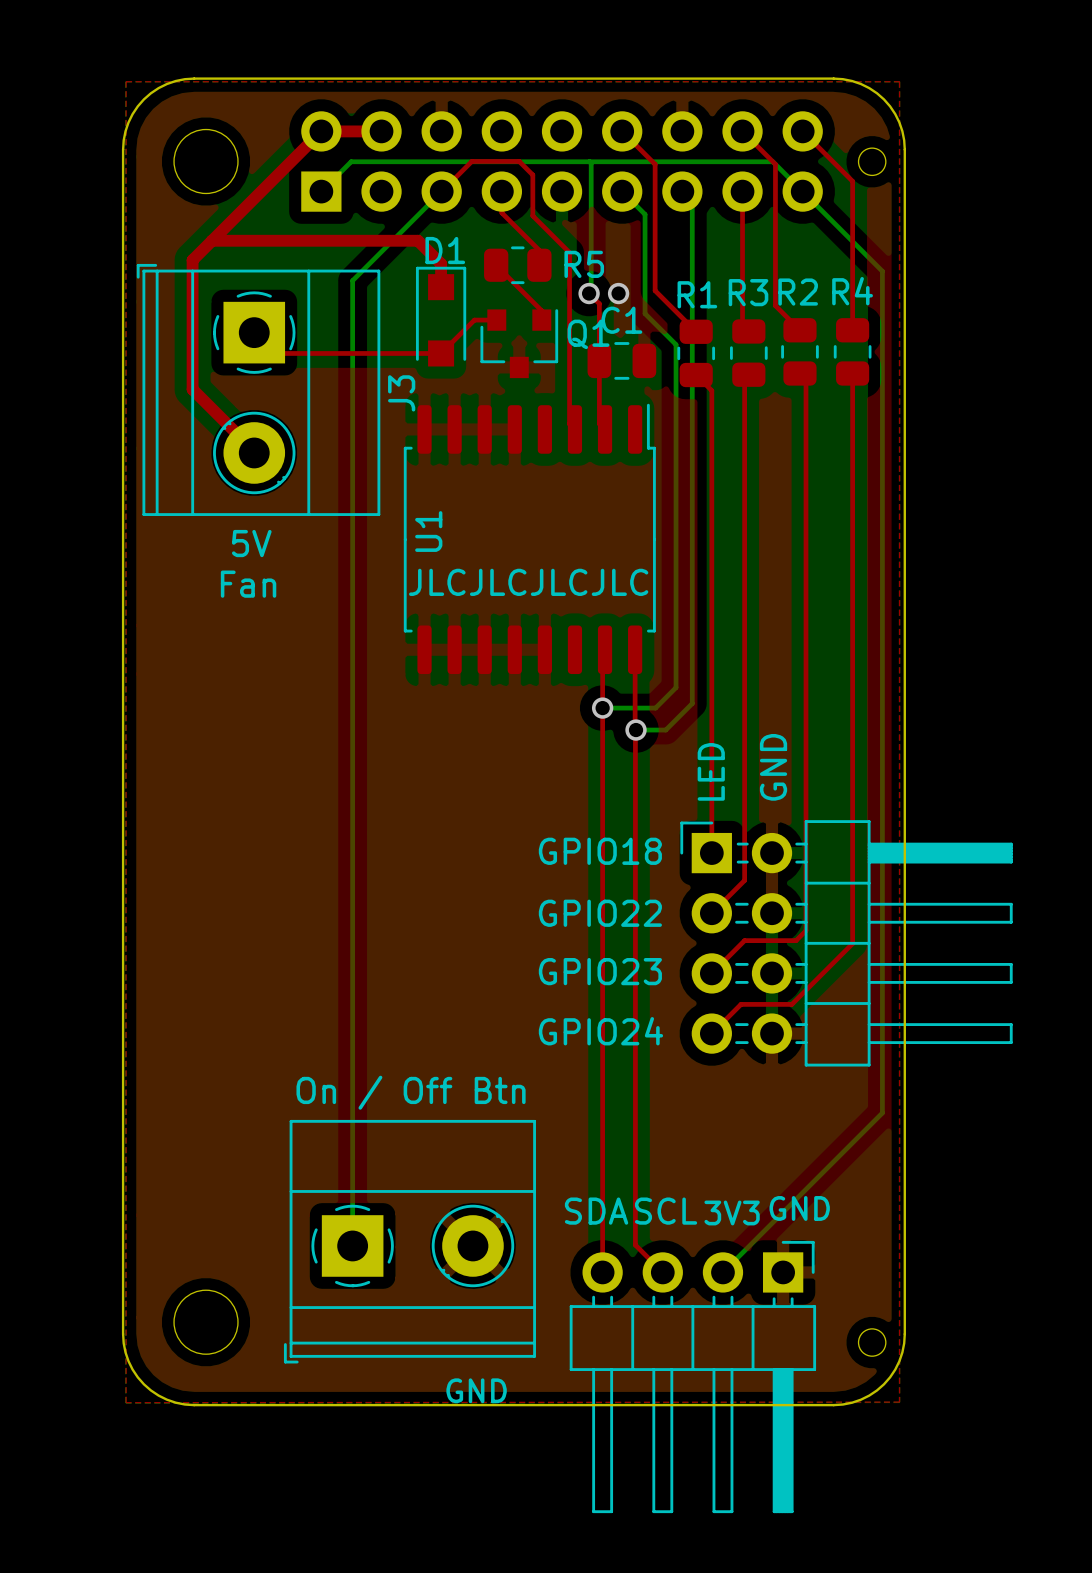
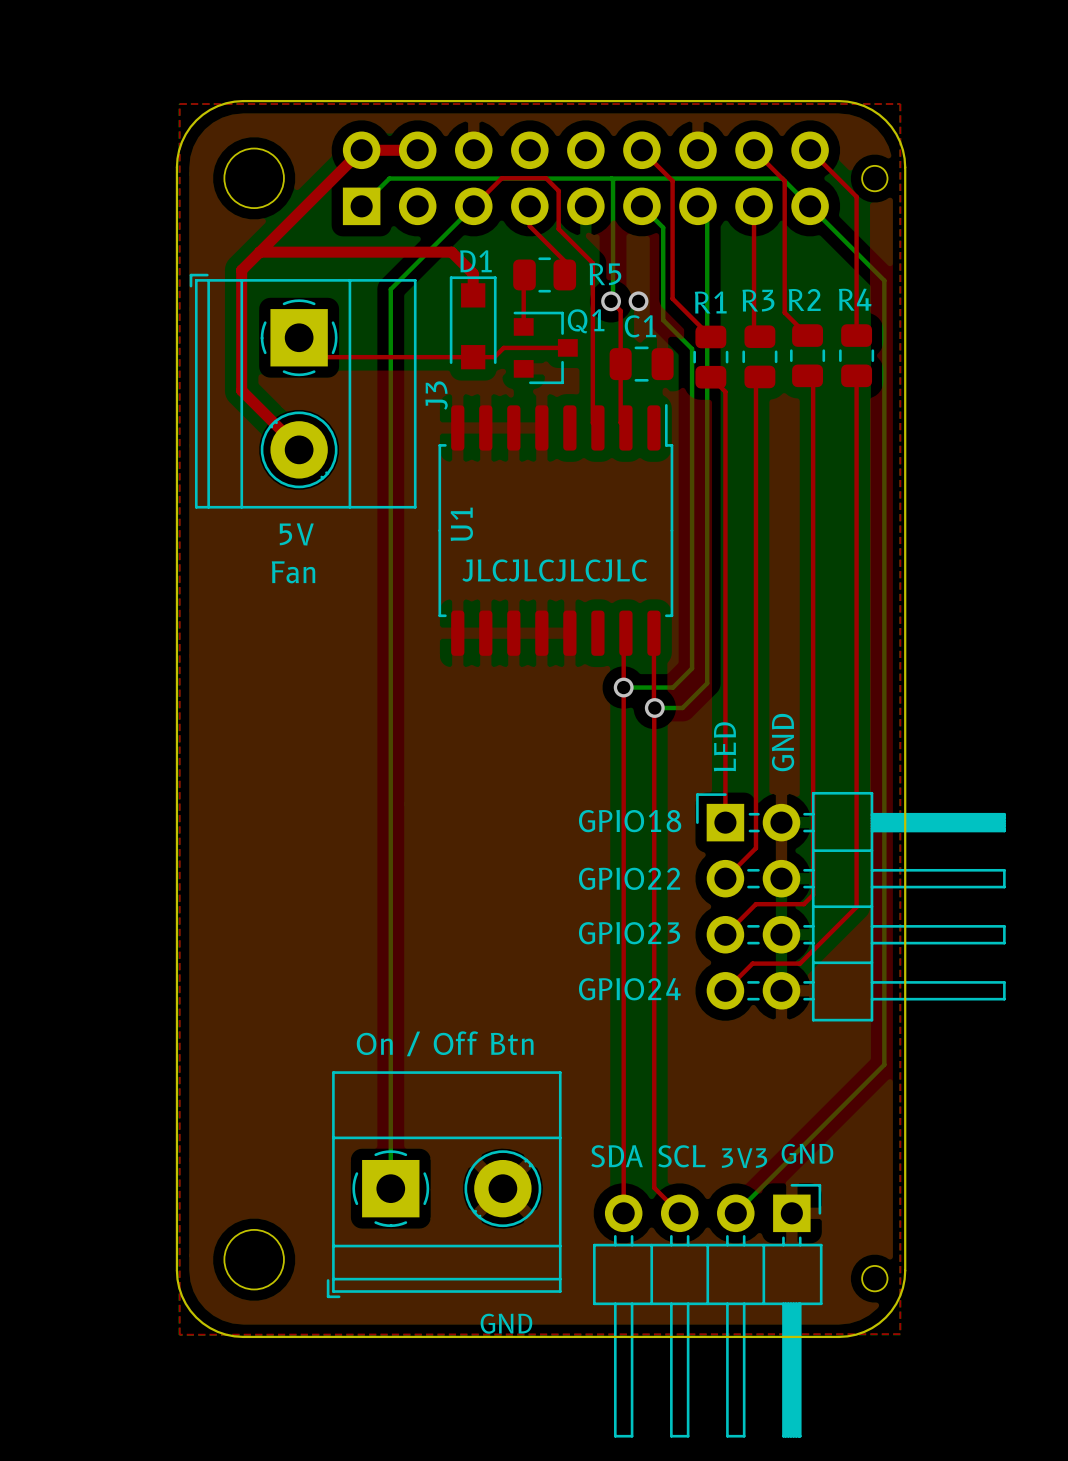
top track: (496, 265) (541, 310) (541, 320) -> (524, 274) (523, 326)
top track: (496, 320) (474, 320) (441, 353) -> (567, 347) (503, 347) (494, 357) (473, 357)
Q1 rotation: 0° (519, 343) -> 90° counterclockwise (545, 347)

